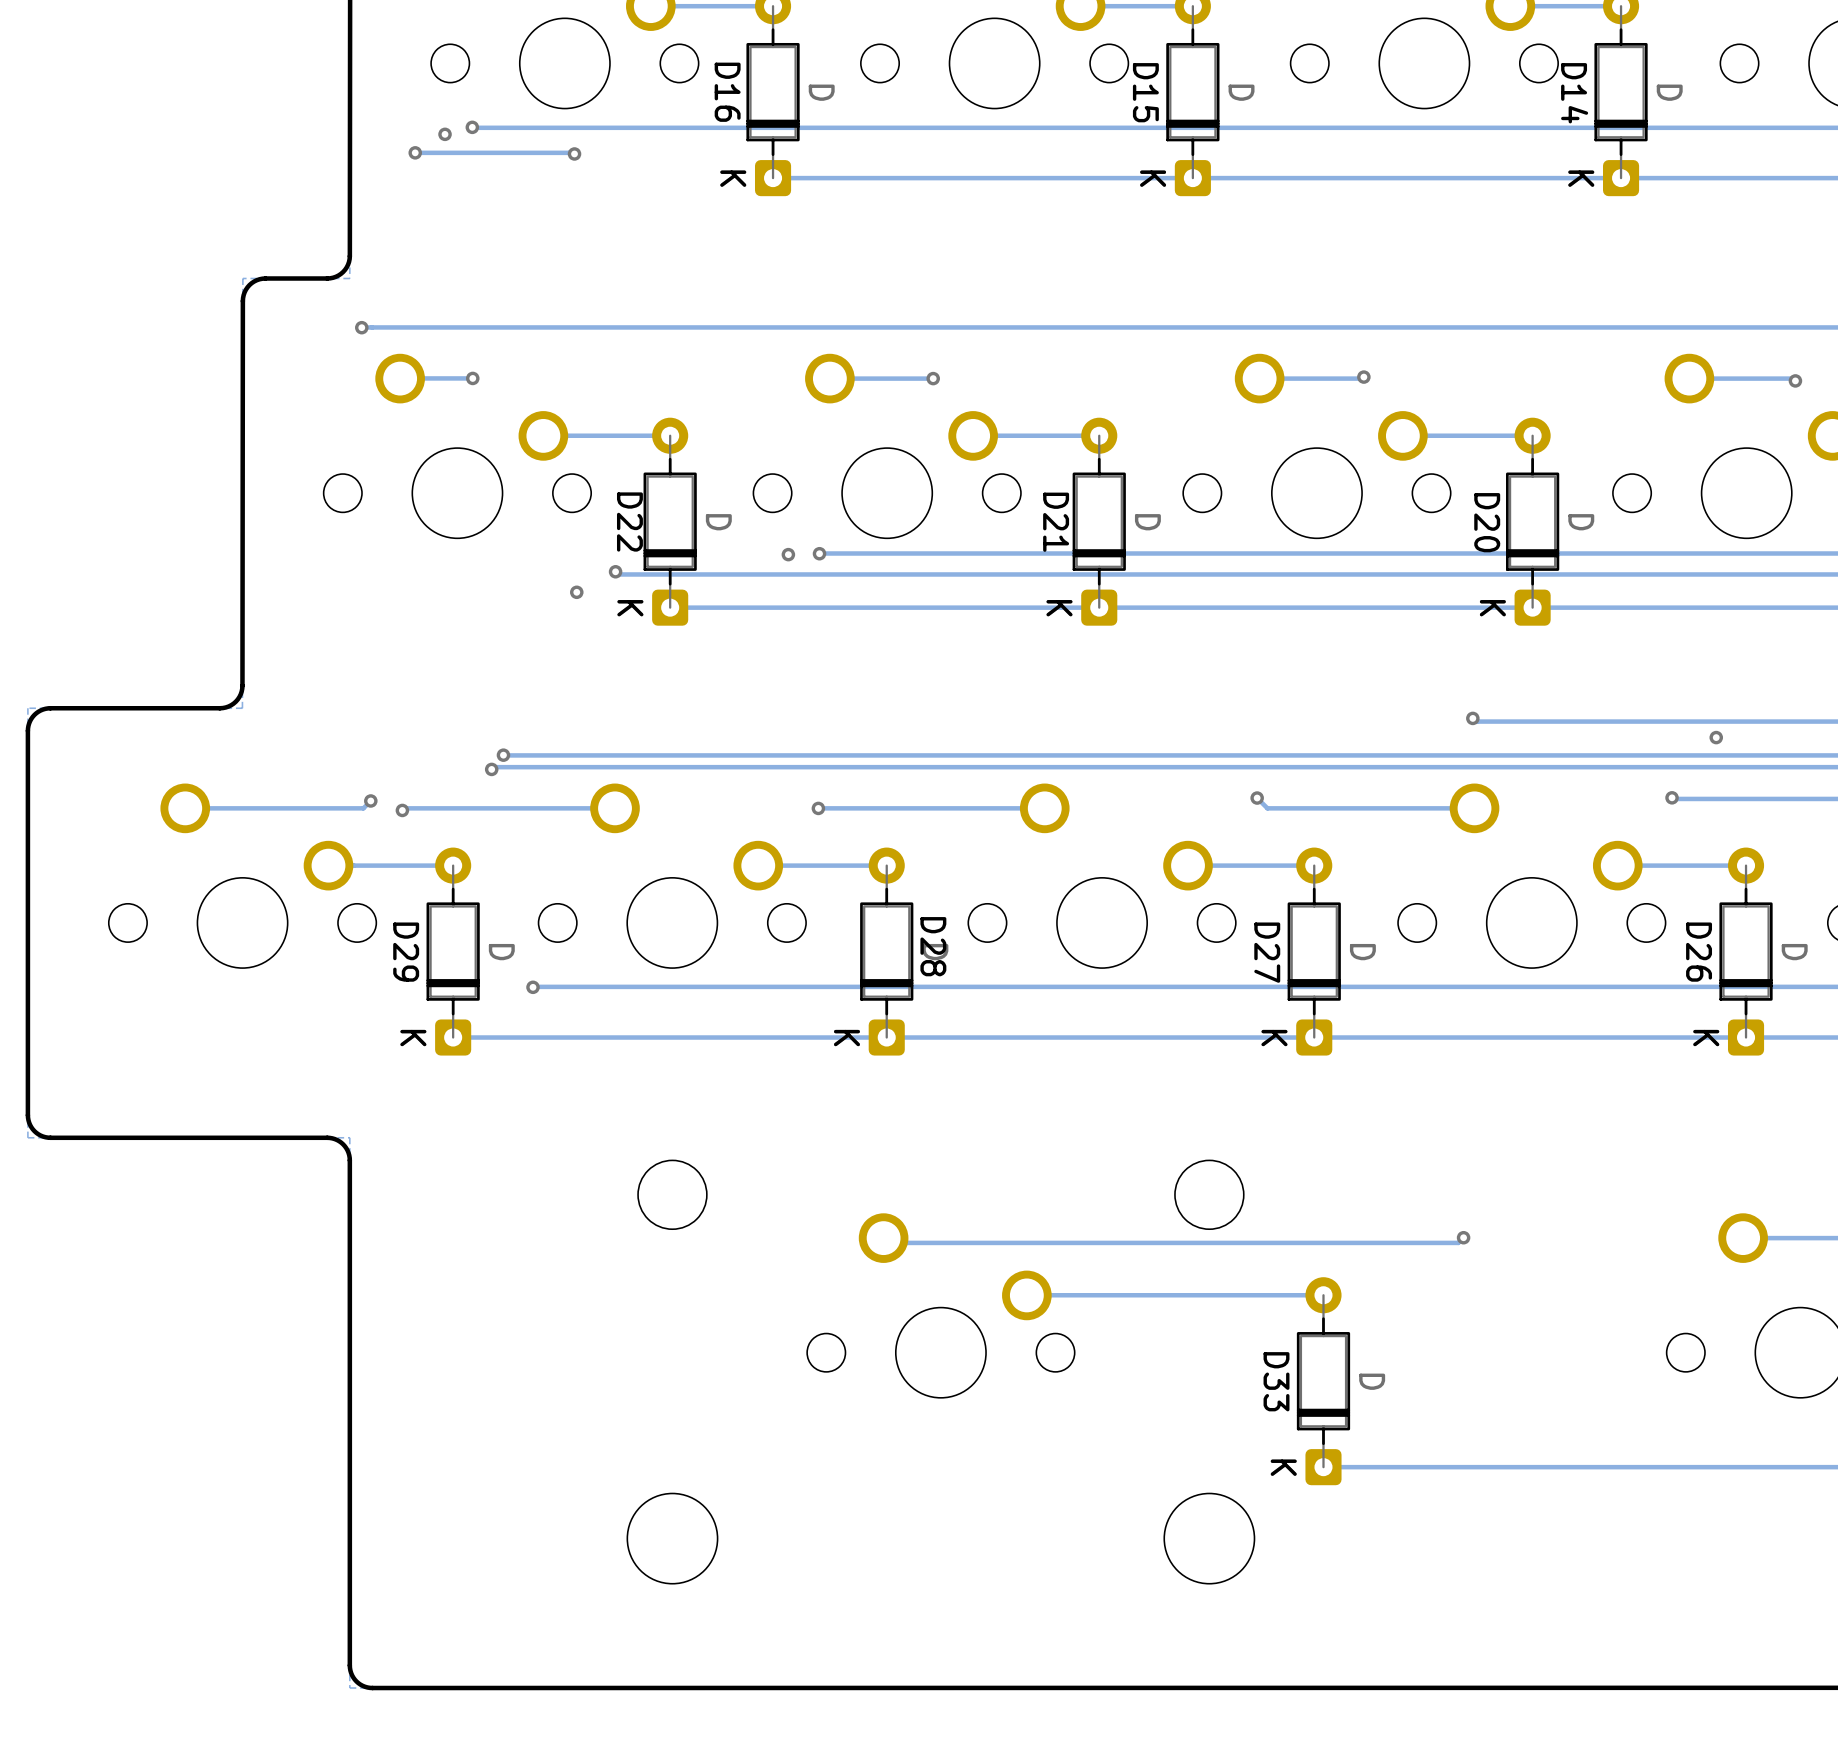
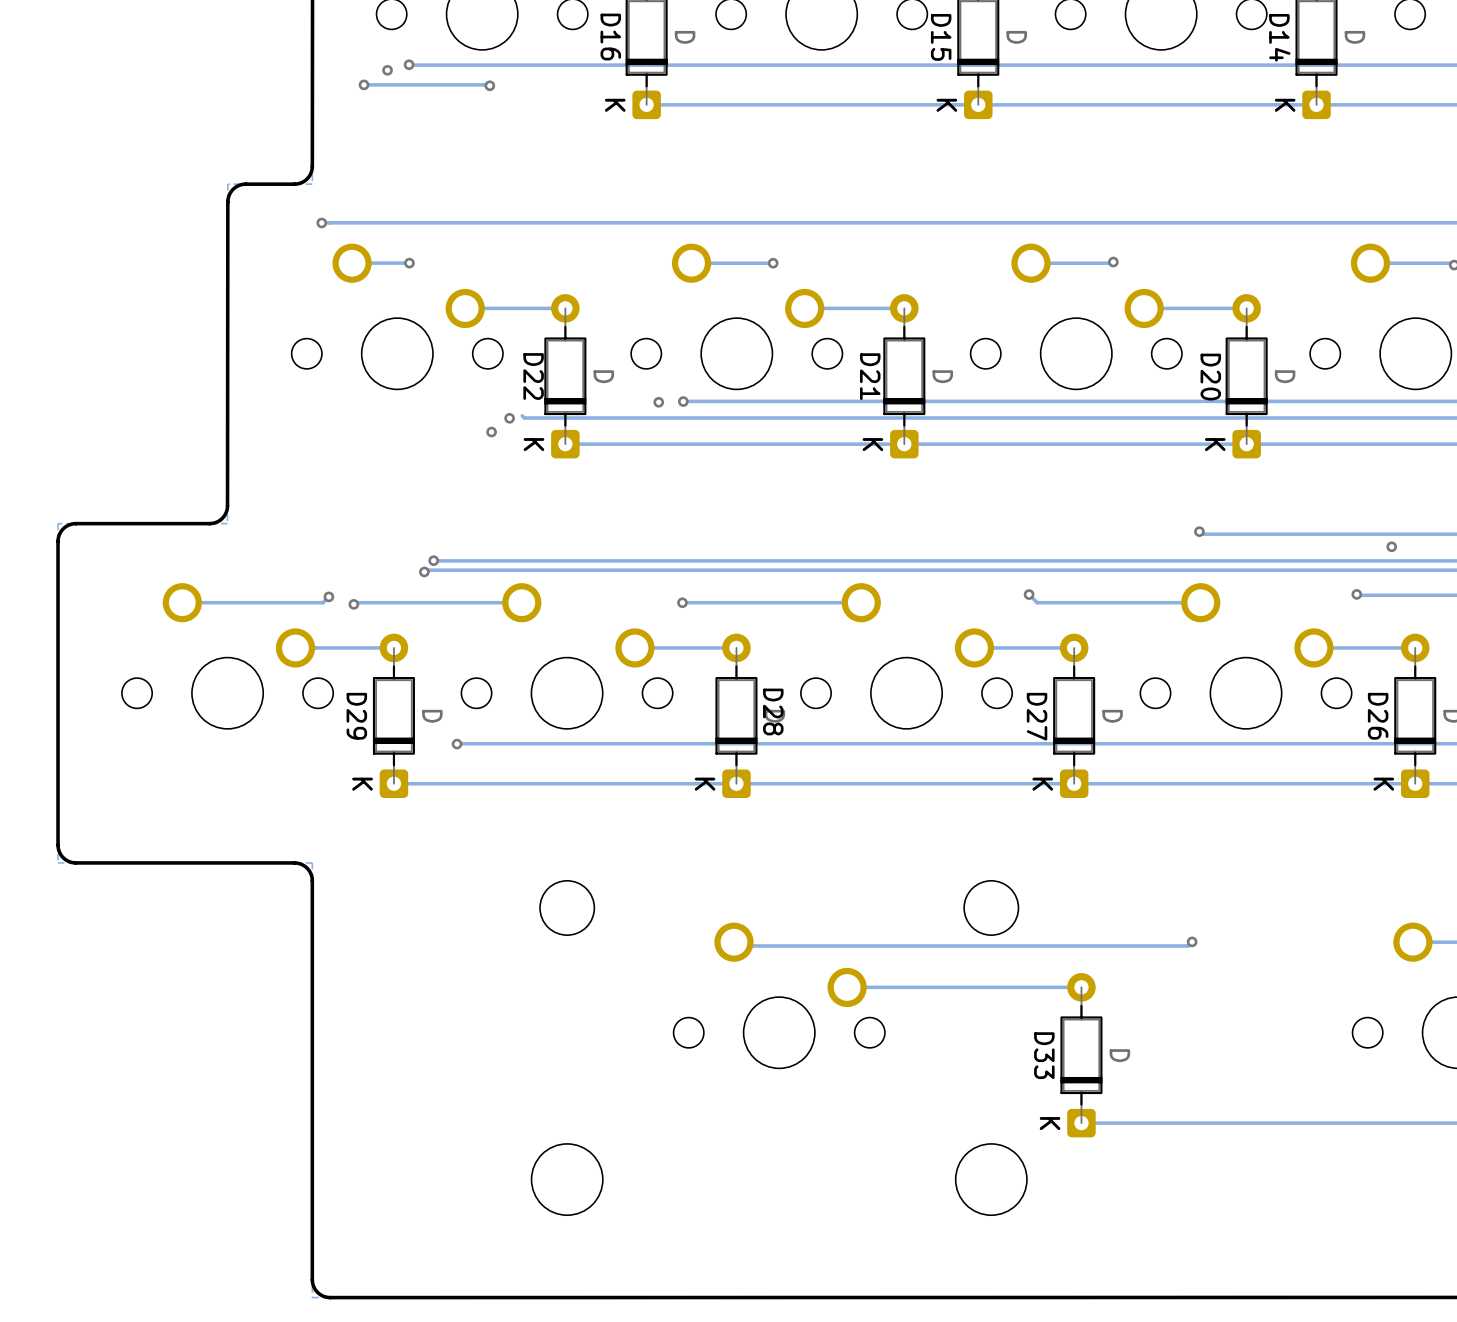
via position: (615, 571) -> (509, 418)

